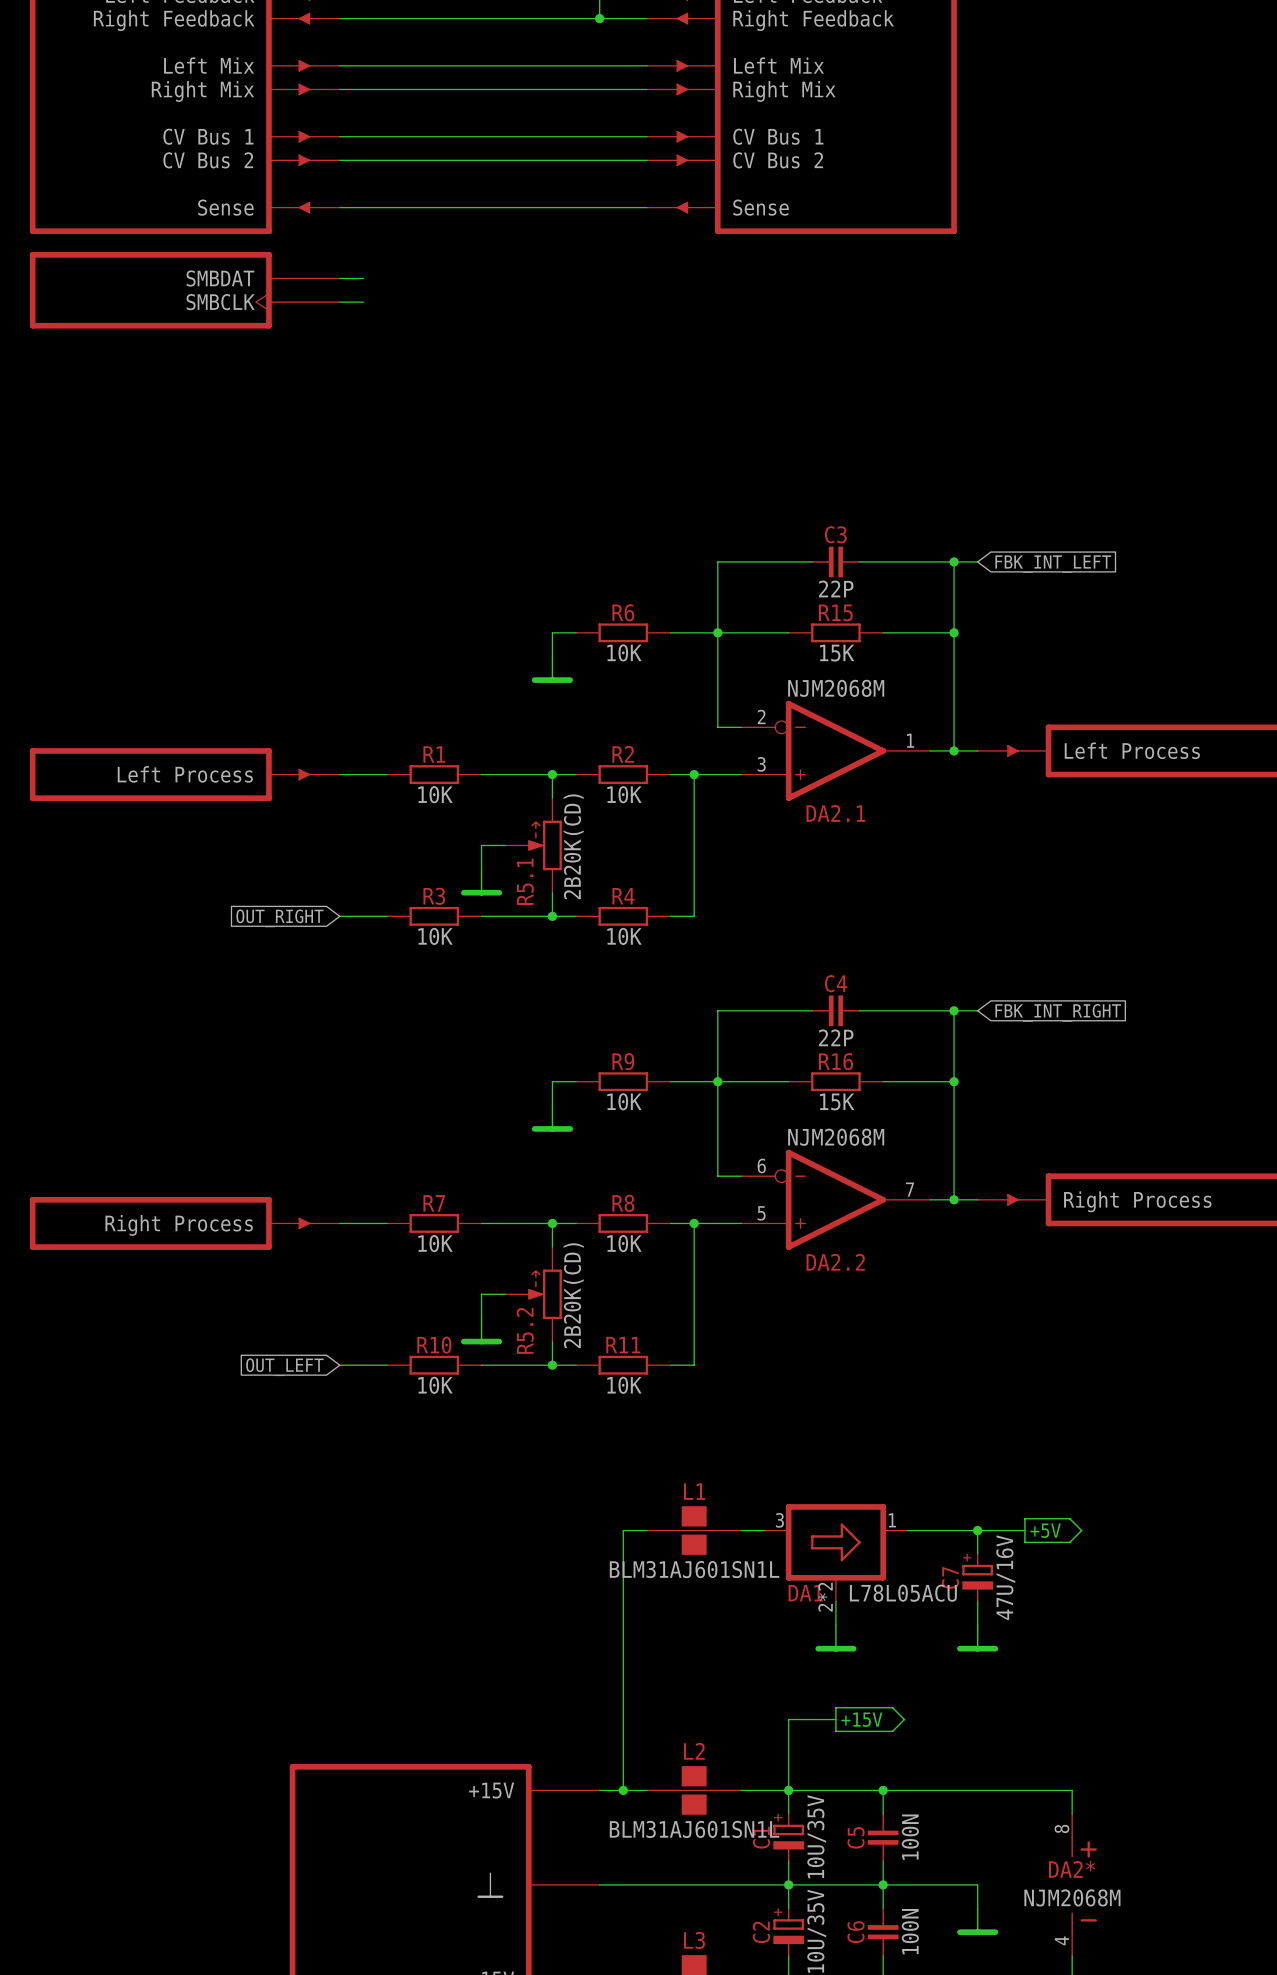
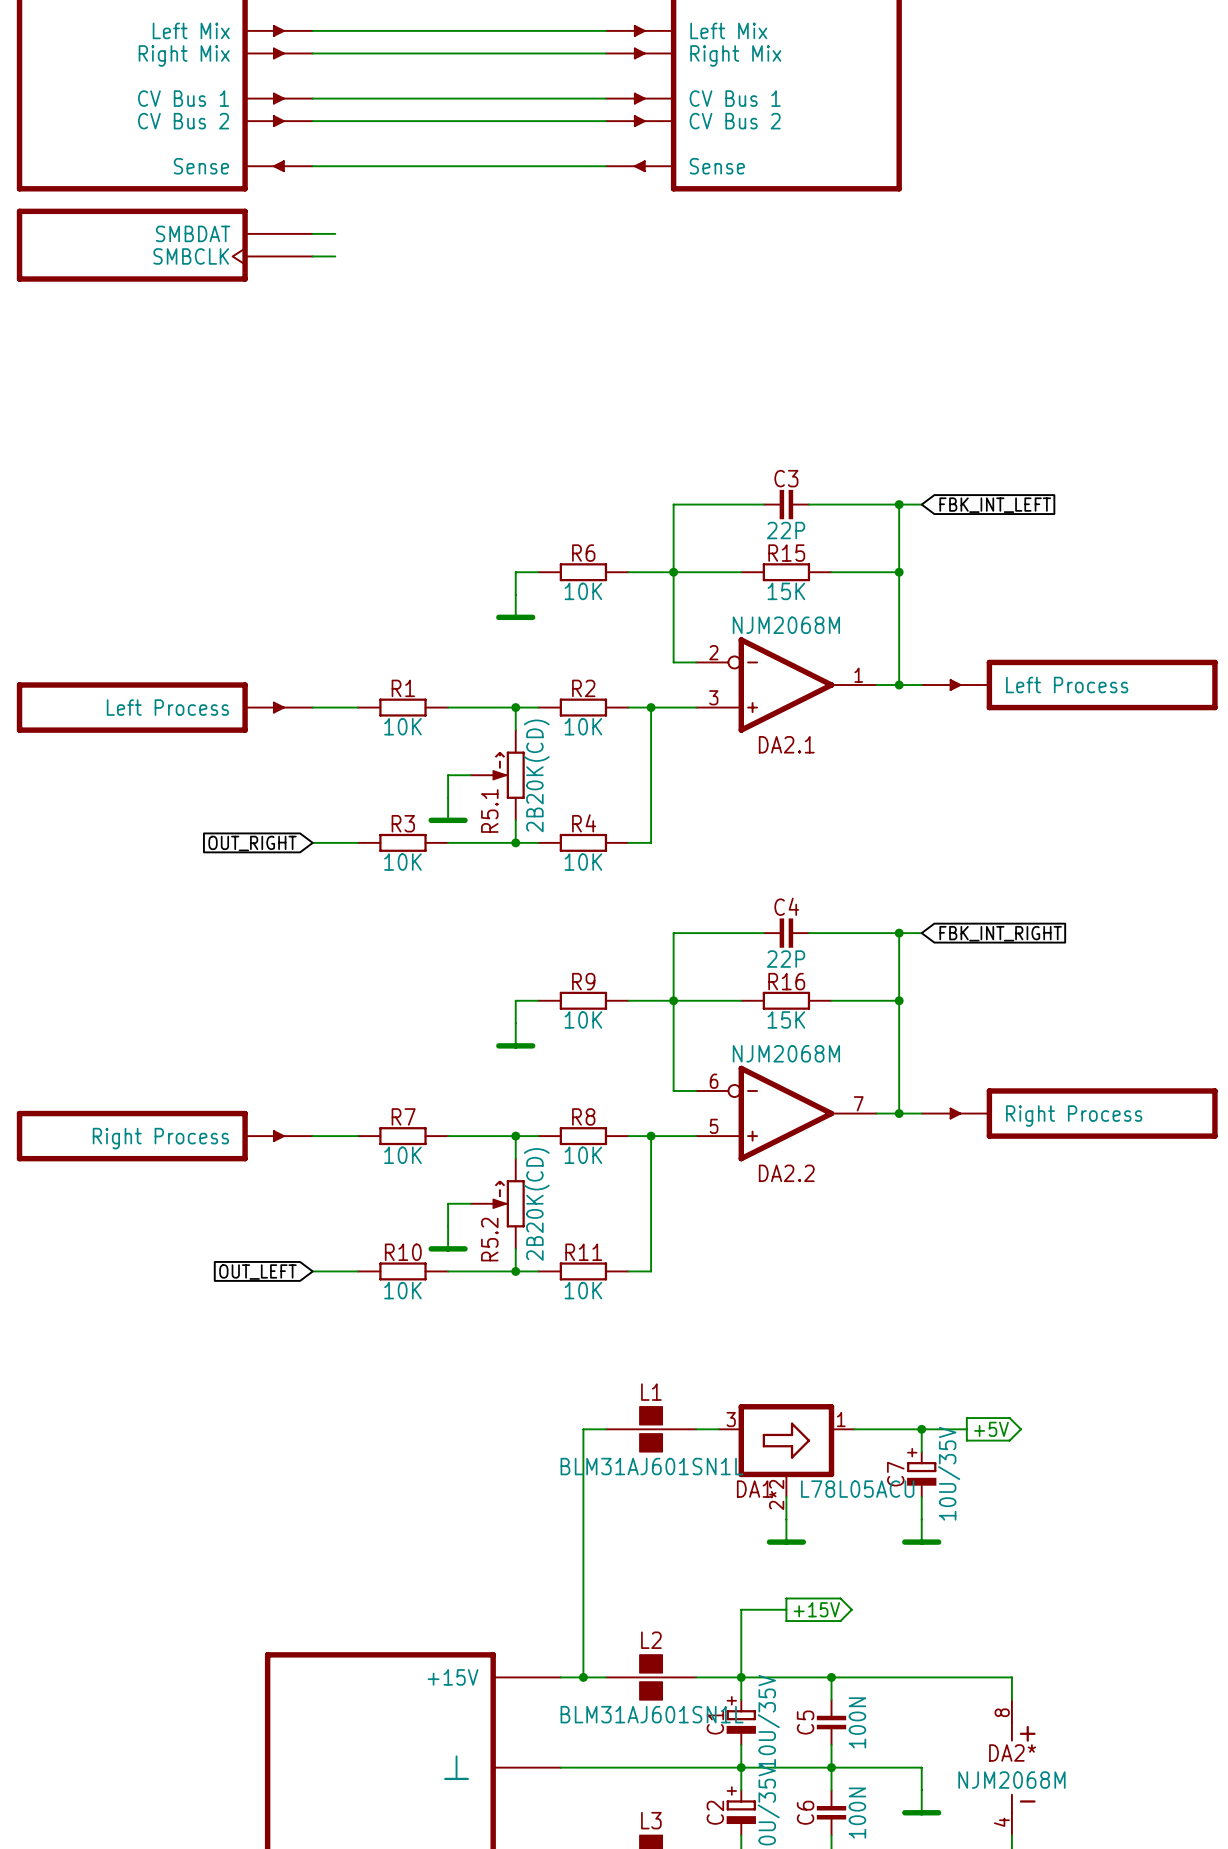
C7 value: 47U/16V (1005, 1577) -> 10U/35V (949, 1473)

